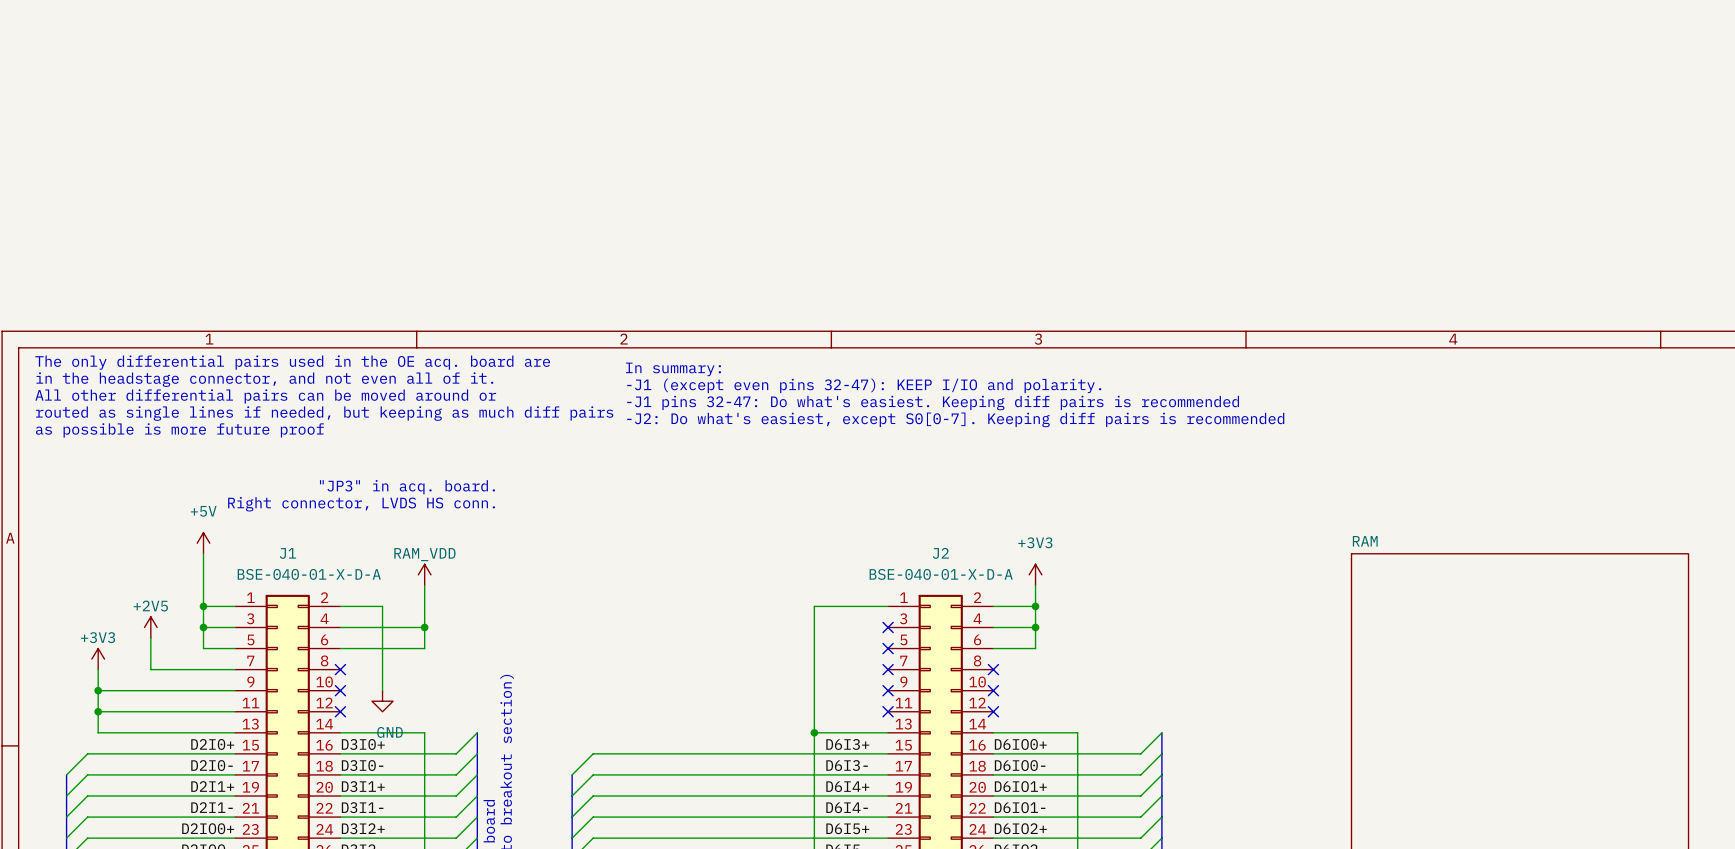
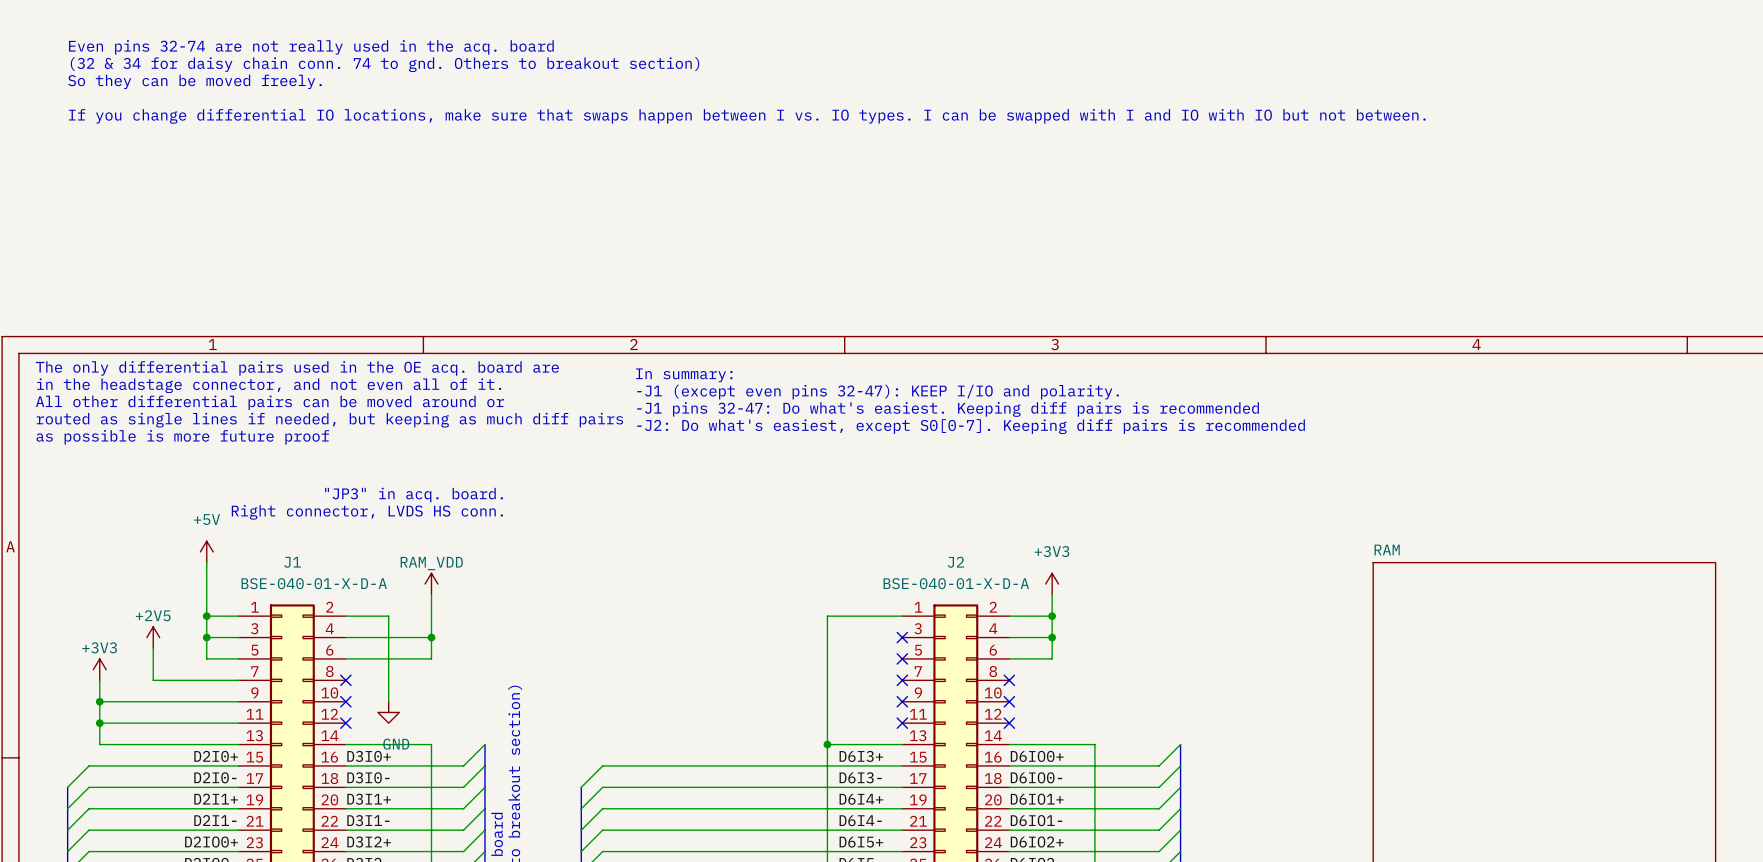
text: none -> Even pins 32-74 are not really used in the acq. board (311, 47)
text: none -> (32 & 34 for daisy chain conn. 74 to gnd. Others to breakout section) (385, 64)
text: none -> So they can be moved freely. (195, 81)
text: none -> If you change differential IO locations, make sure that swaps happen between I vs. IO types. I can be swapped with I and IO with IO but not between. (747, 116)

